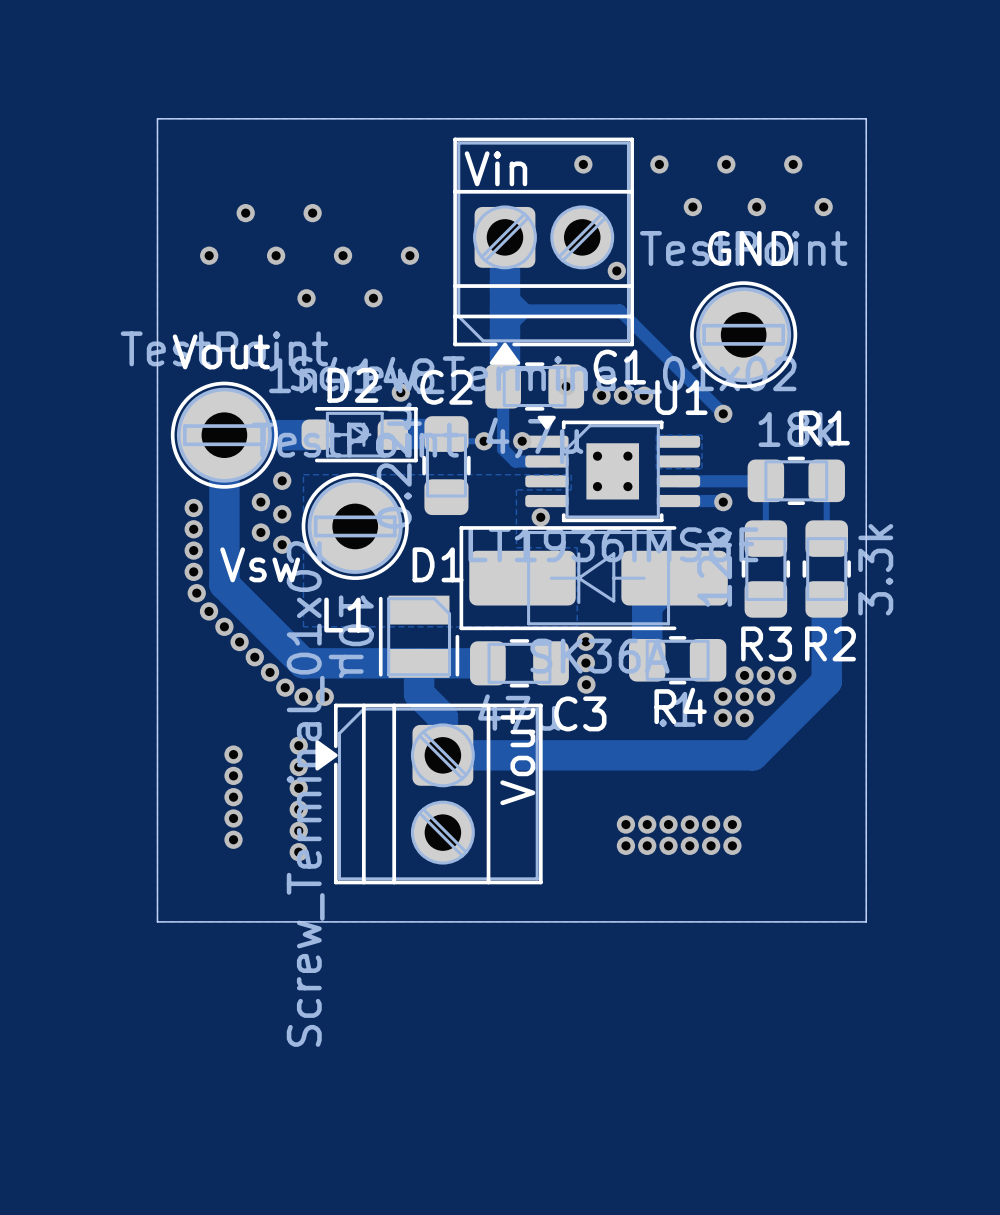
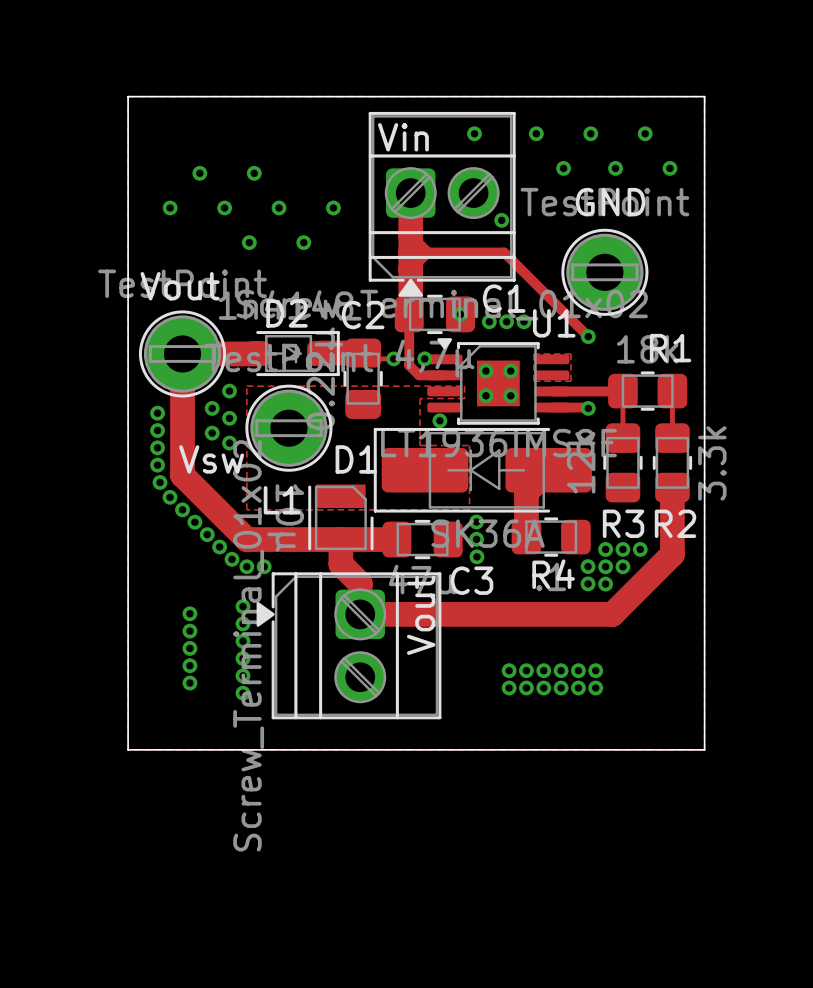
via: (400, 392) -> none

